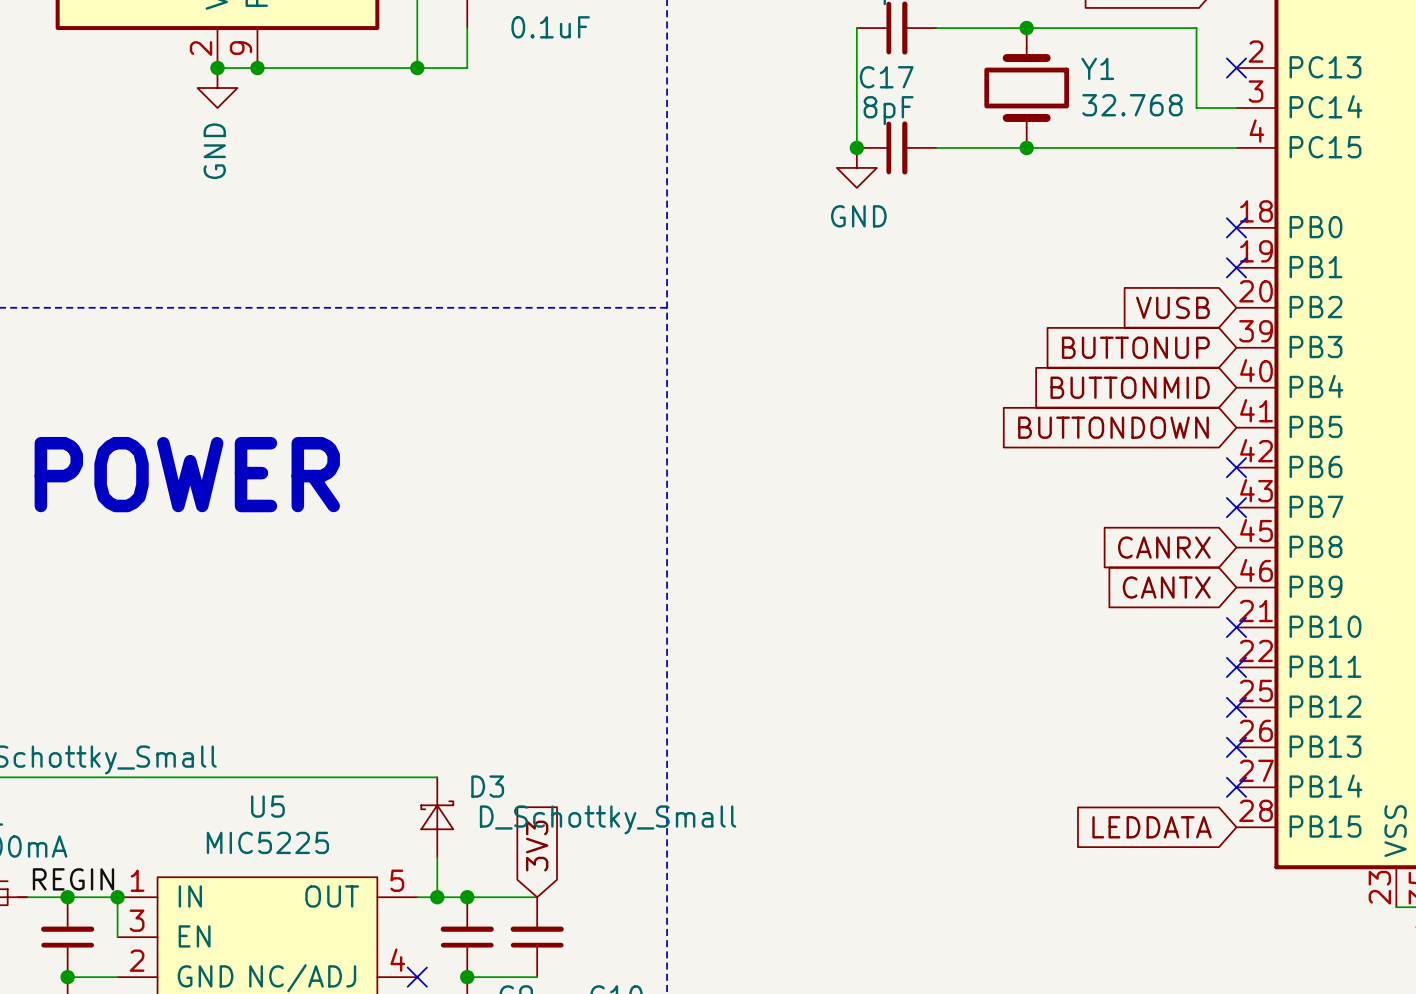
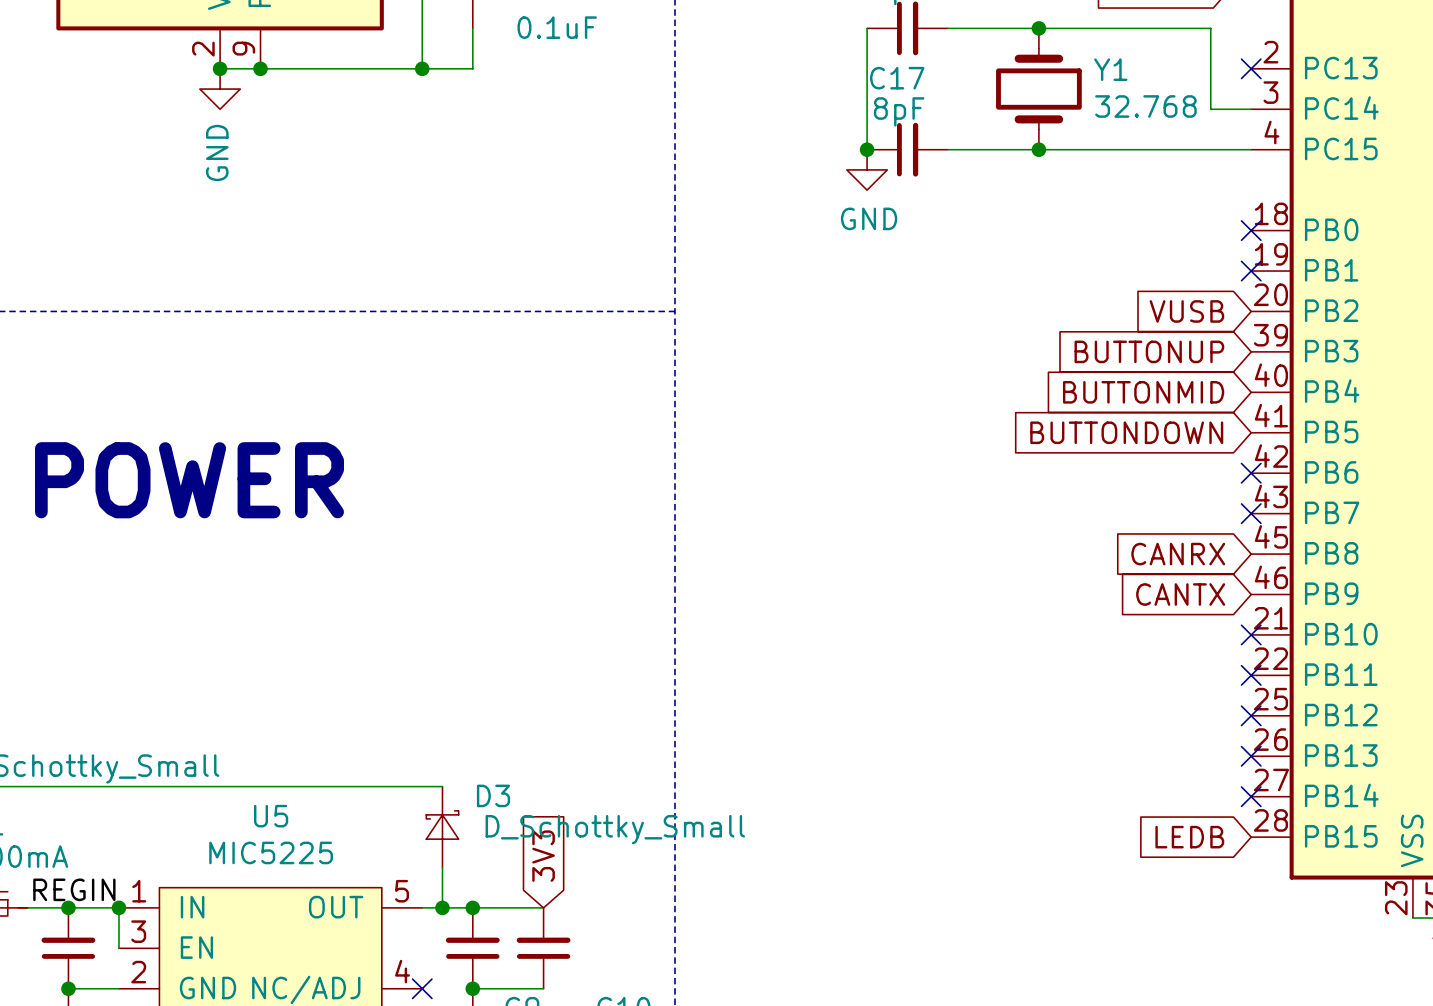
global label: LEDDATA (1152, 827) -> LEDB (1189, 837)

